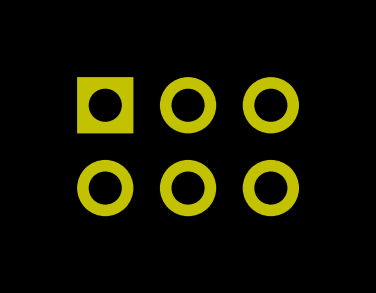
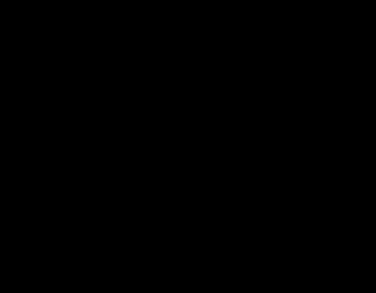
part: (188, 146) -> none

